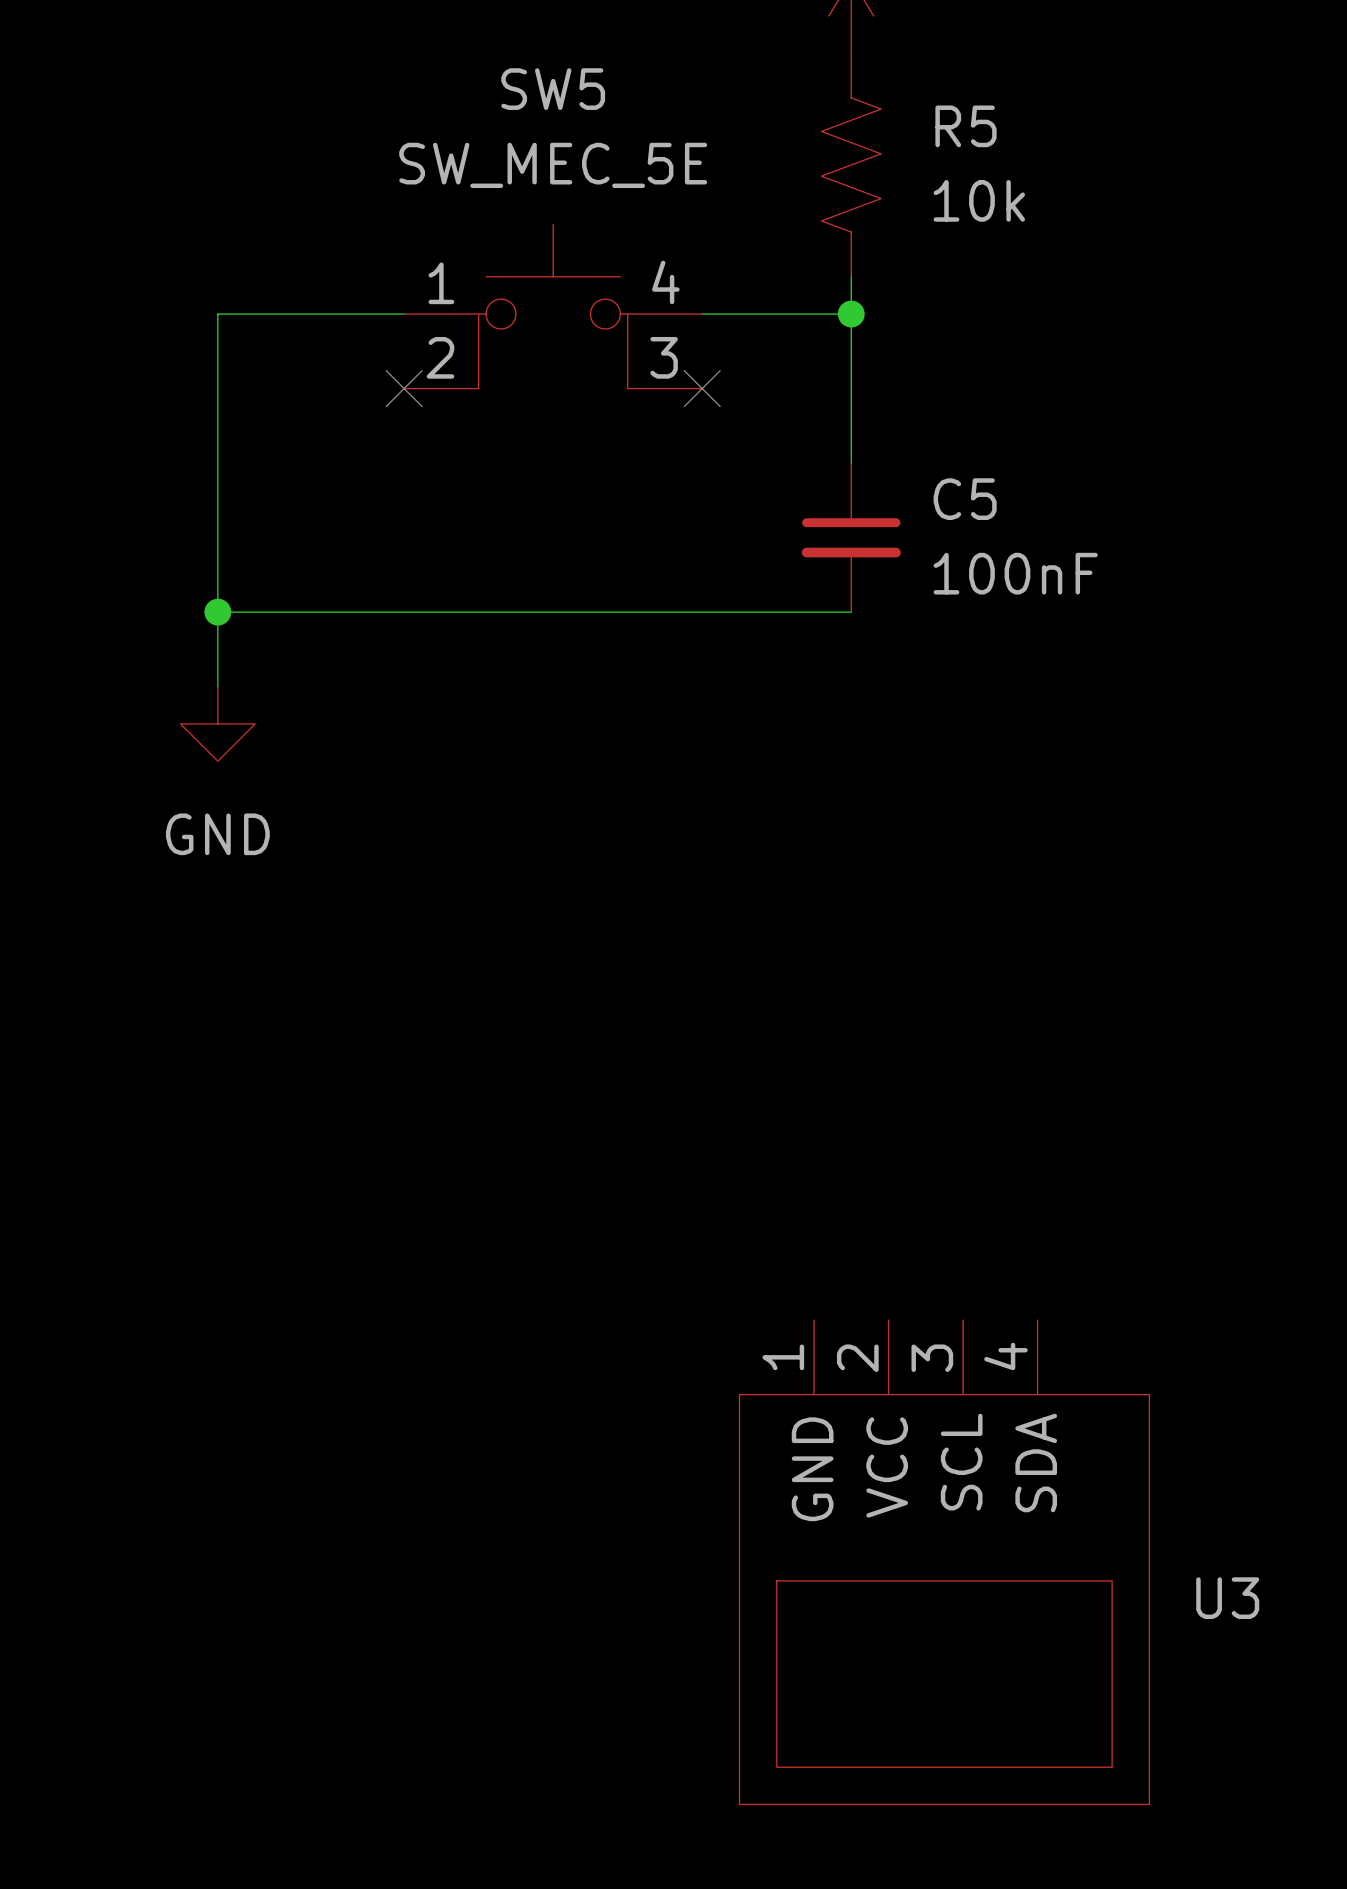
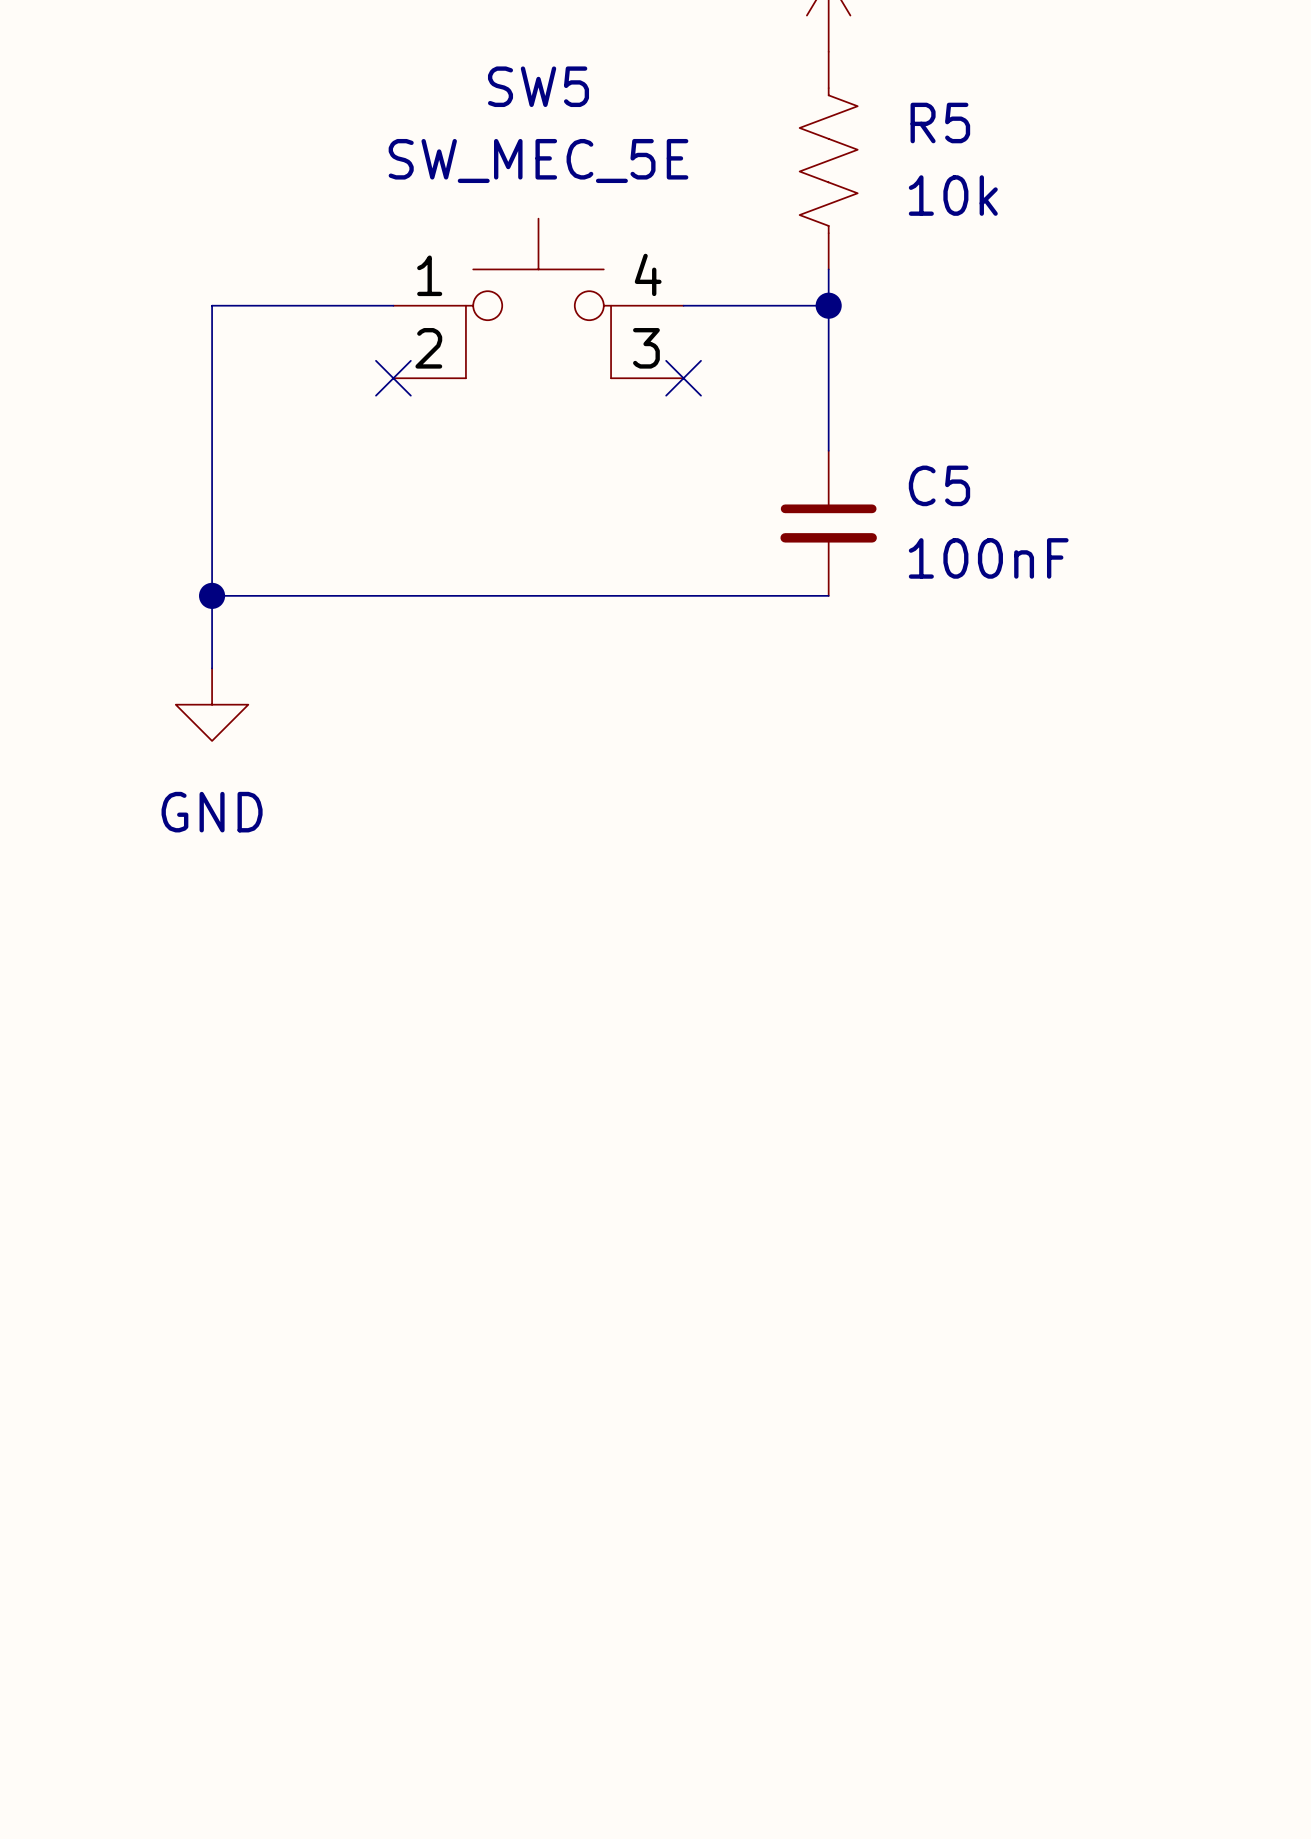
U3: (944, 1562) -> none

